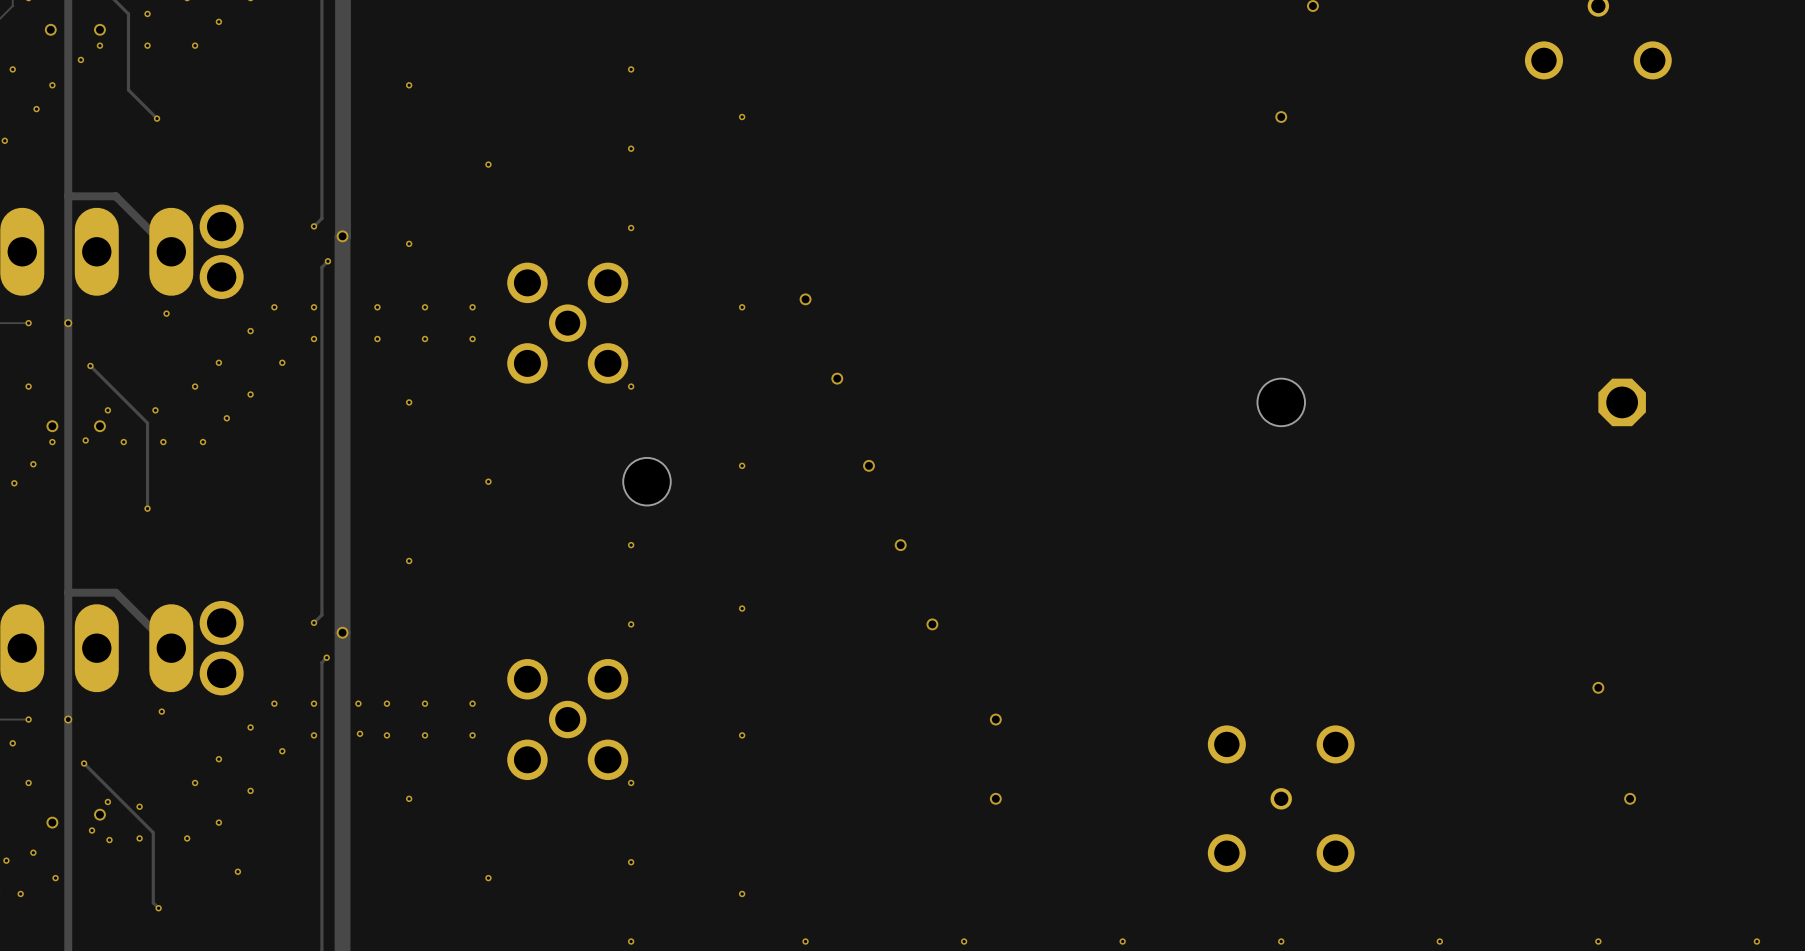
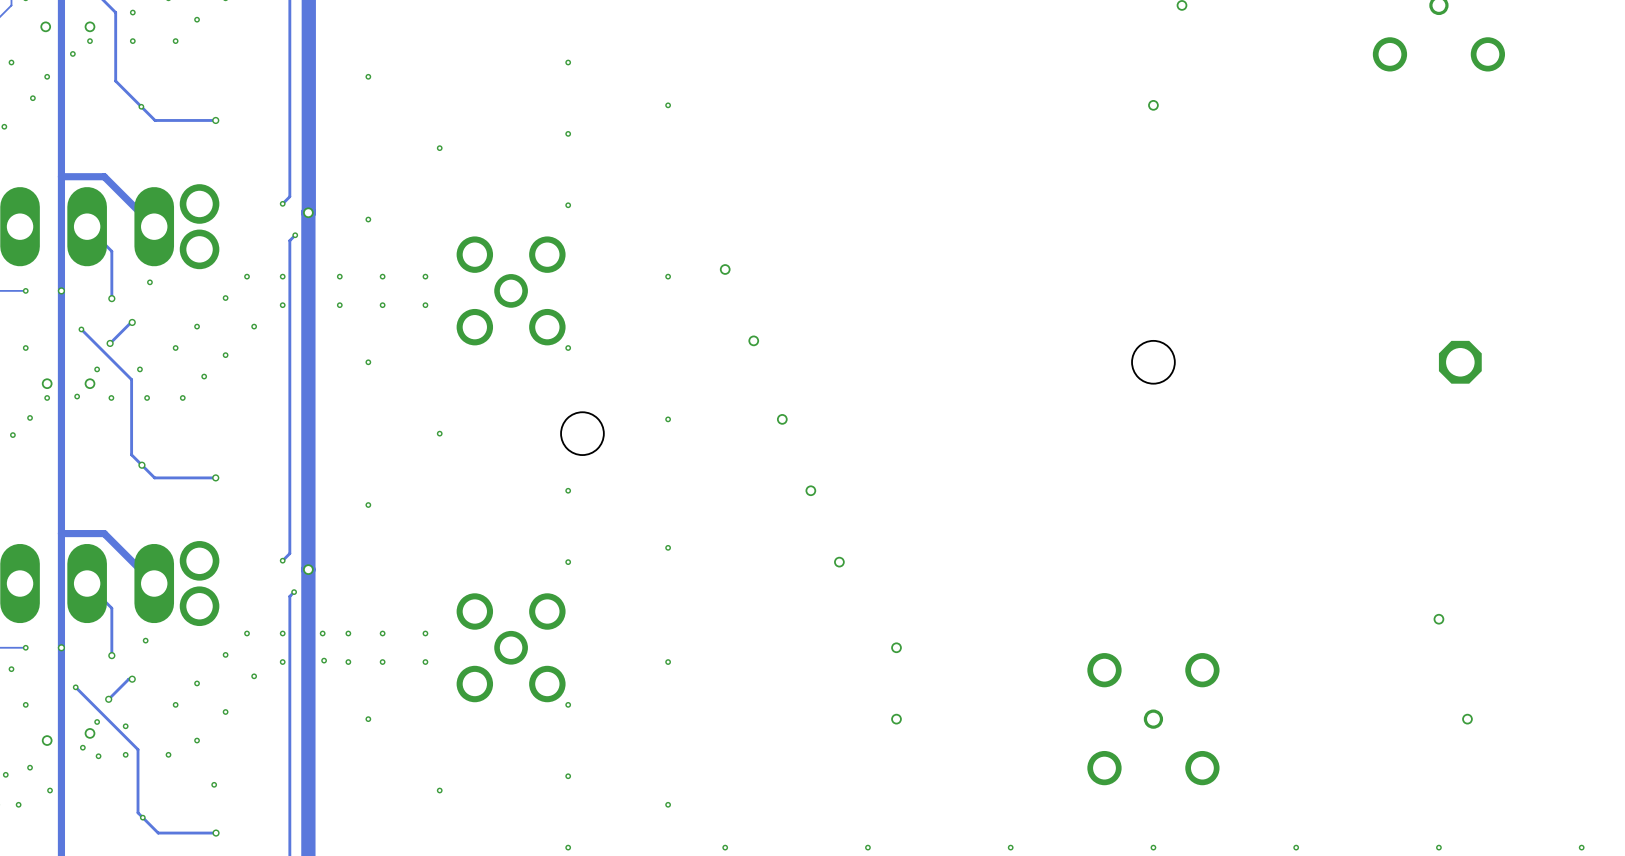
track: none -> (141, 106) (155, 120) (215, 120)
via: none -> (215, 120)
track: none -> (87, 226) (111, 251) (111, 298)
via: none -> (111, 298)
track: none -> (132, 322) (110, 343)
via: none -> (132, 322)
via: none -> (110, 343)
track: (146, 421) (147, 508) -> (131, 379) (131, 454) (154, 477) (215, 477)
via: (147, 508) -> none
via: none -> (141, 465)
via: none -> (215, 477)
track: none -> (87, 583) (111, 608) (111, 655)
via: none -> (111, 655)
track: none -> (132, 679) (128, 679) (108, 699)
via: none -> (132, 679)
via: none -> (108, 699)
track: none -> (142, 817) (158, 833) (216, 833)
via: none -> (216, 833)

